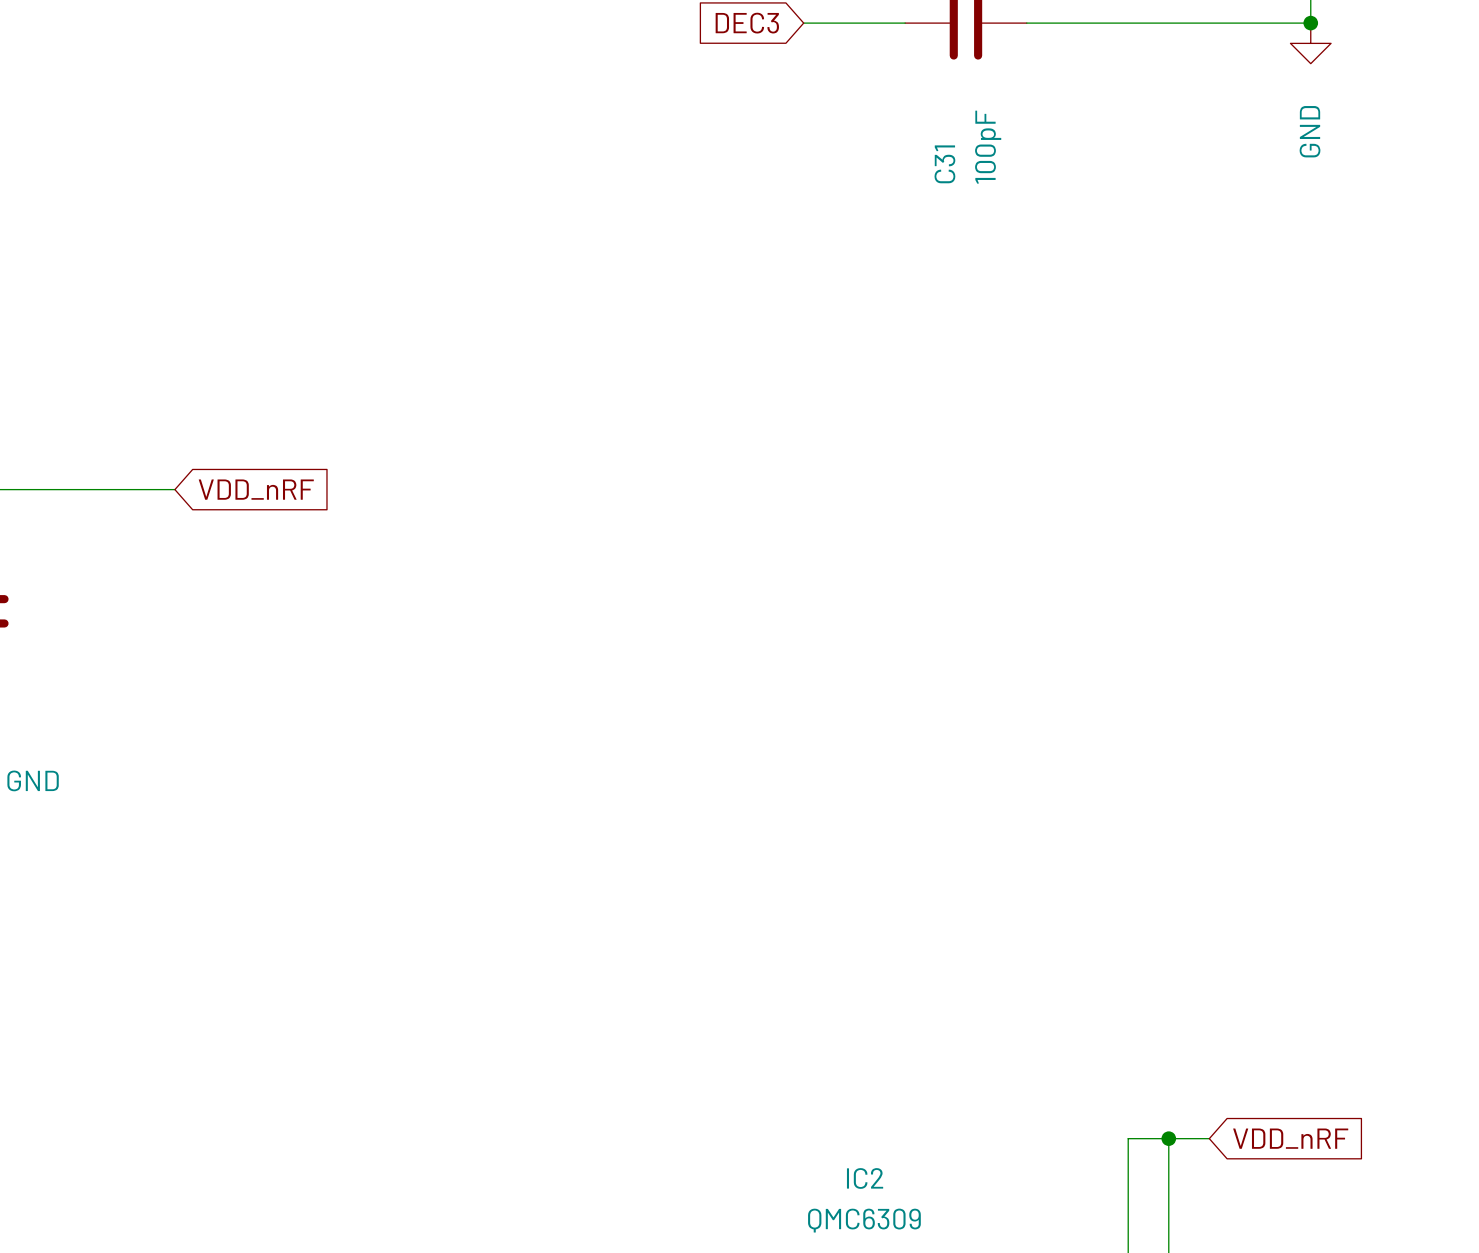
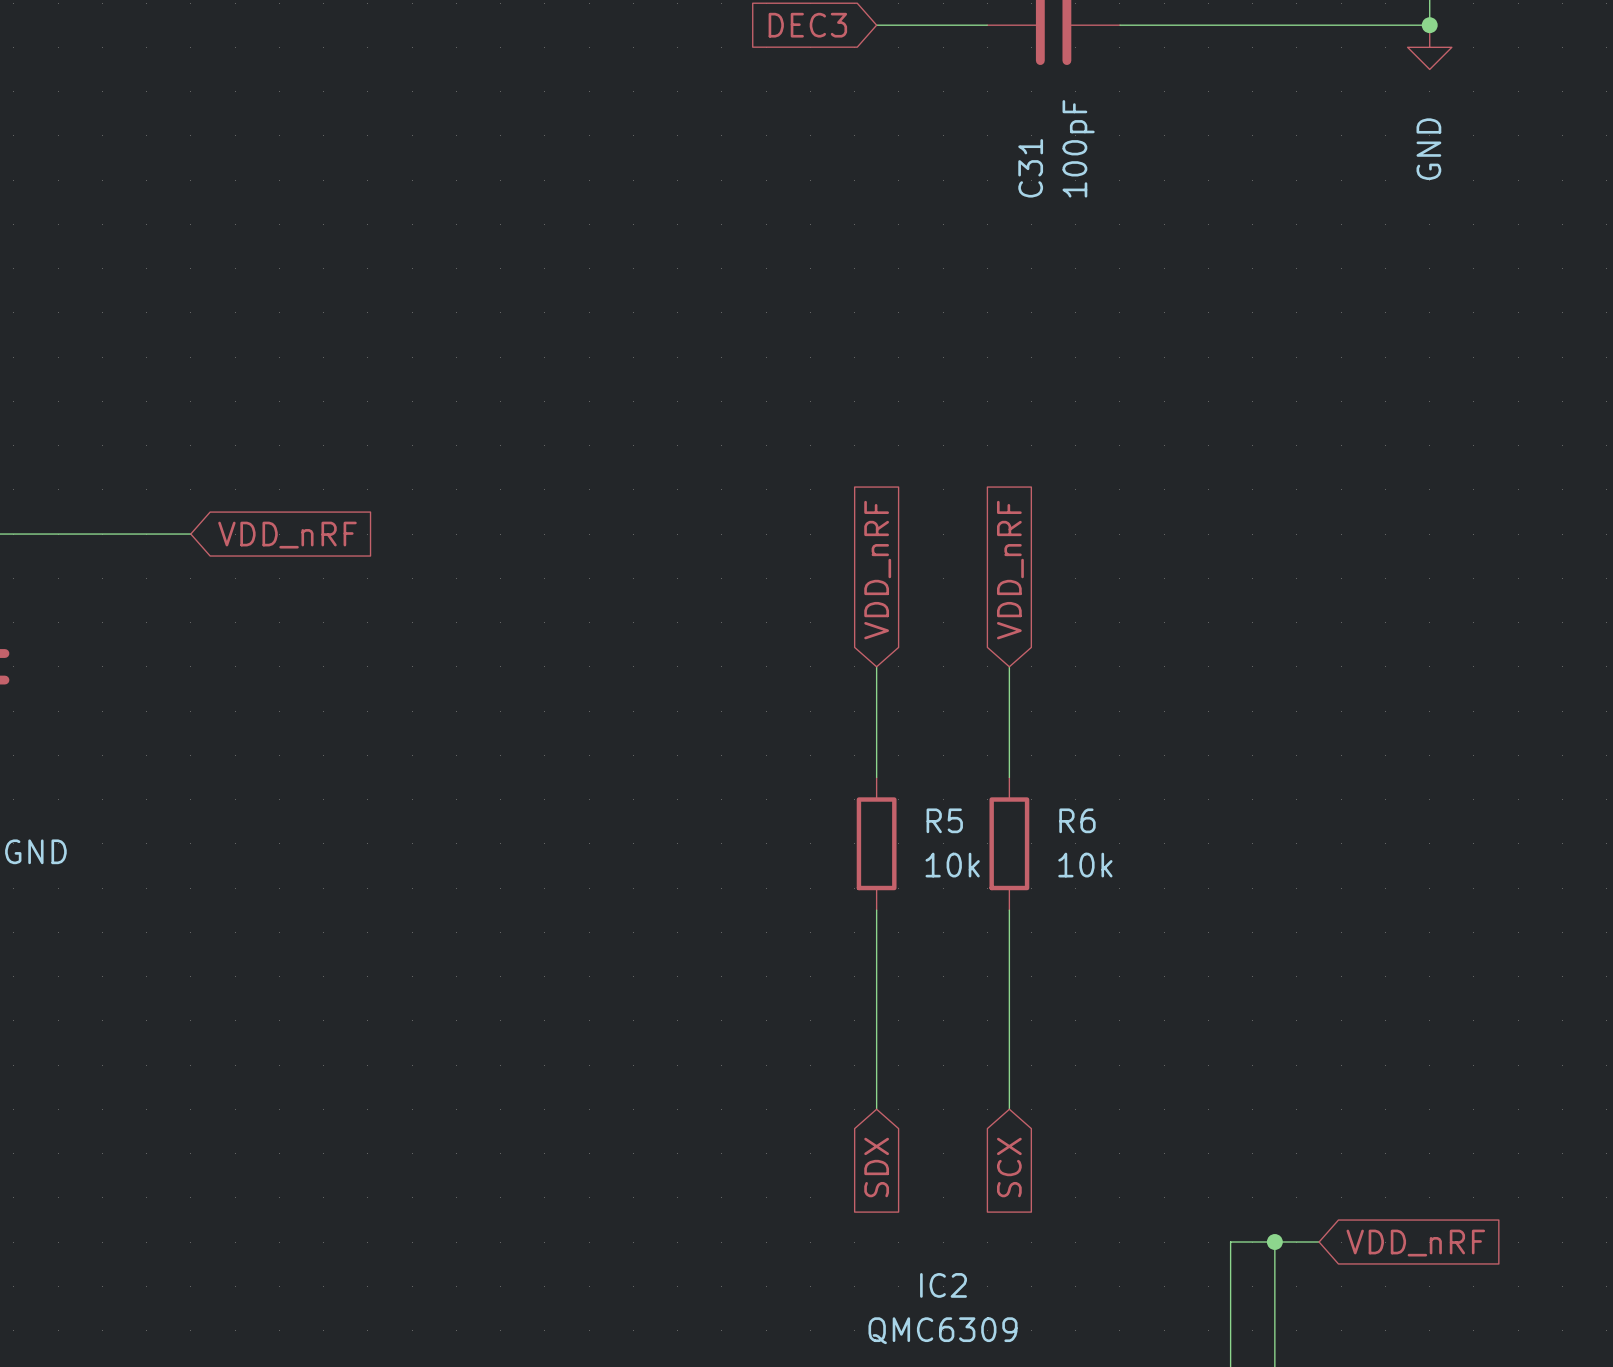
global label: none -> VDD_nRF (877, 570)
global label: none -> VDD_nRF (1010, 570)
wire: none -> (876, 666) (876, 777)
wire: none -> (1009, 666) (1009, 777)
R5: none -> 10k (876, 843)
R6: none -> 10k (1009, 843)
wire: none -> (876, 910) (876, 1109)
wire: none -> (1009, 910) (1009, 1109)
global label: none -> SDX (876, 1167)
global label: none -> SCX (1009, 1167)

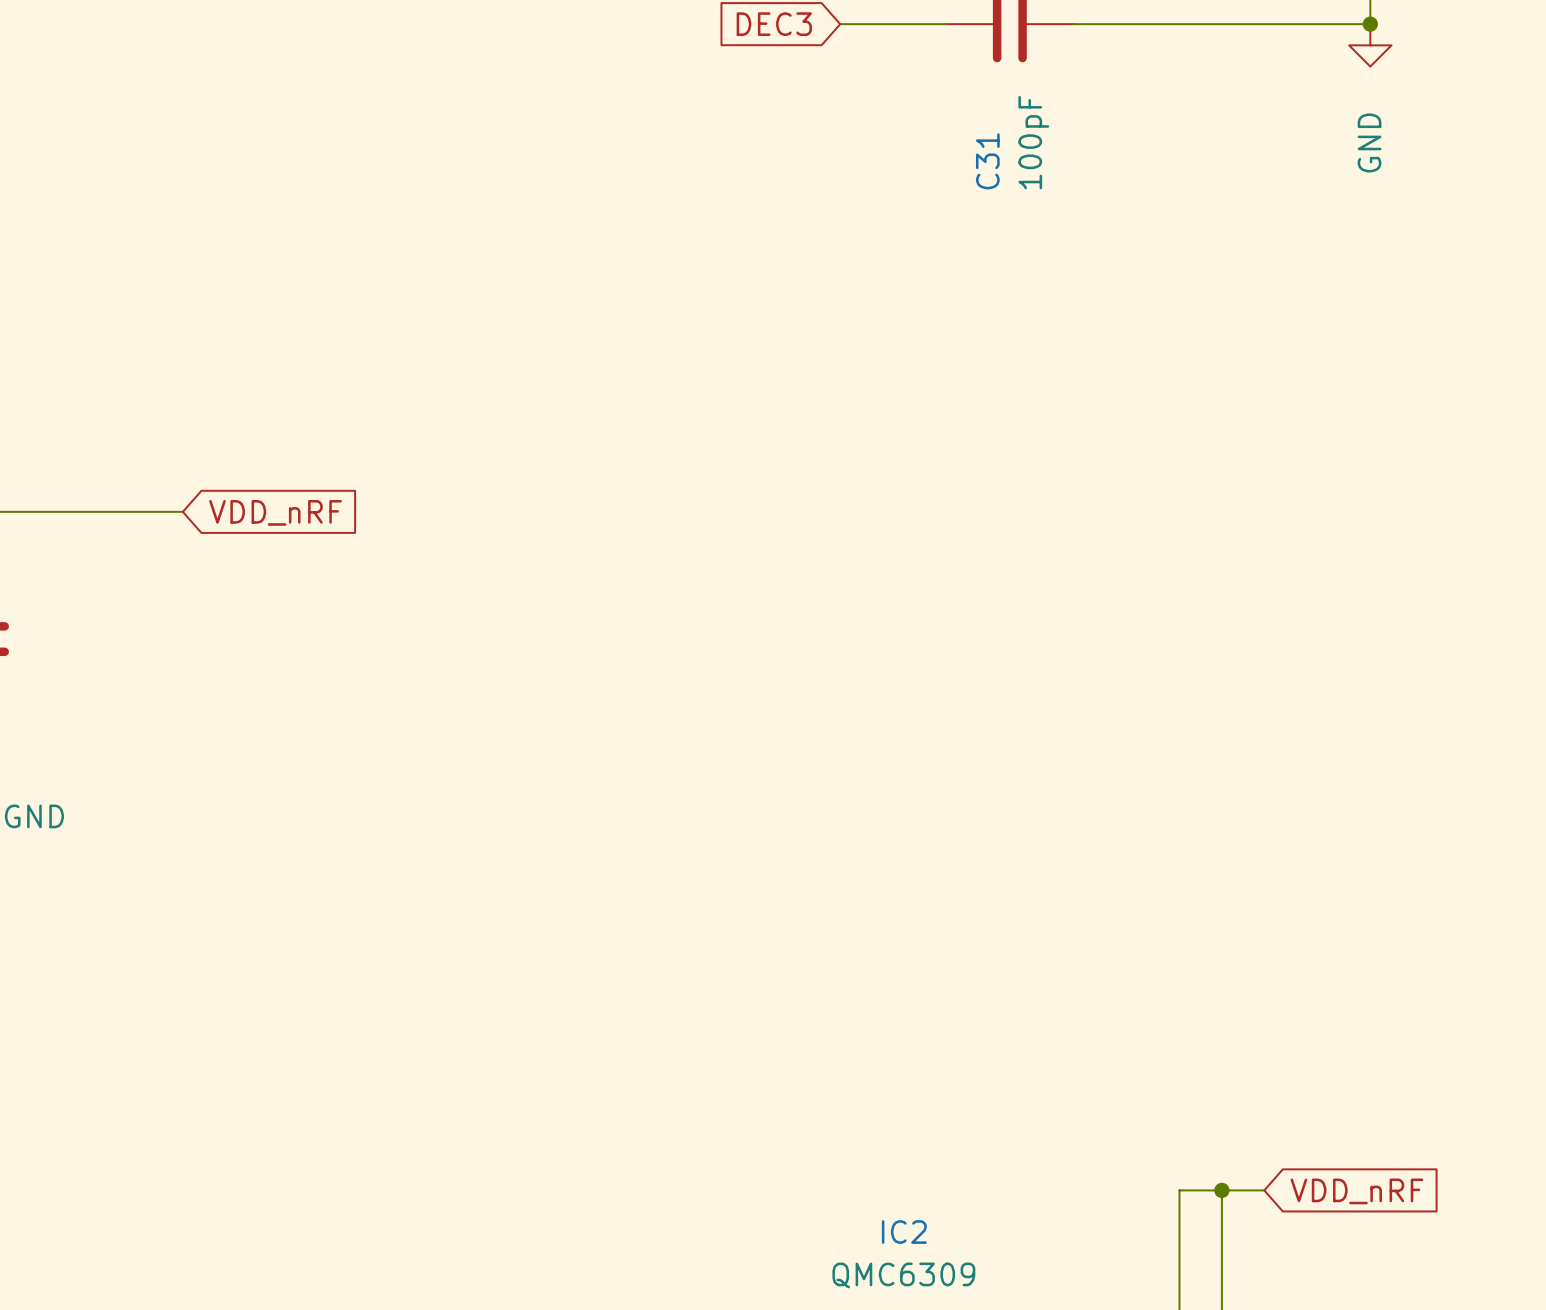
global label: VDD_nRF (877, 570) -> none
global label: VDD_nRF (1010, 570) -> none
wire: (876, 666) (876, 777) -> none
wire: (1009, 666) (1009, 777) -> none
R5: 10k (876, 843) -> none
R6: 10k (1009, 843) -> none
wire: (876, 910) (876, 1109) -> none
wire: (1009, 910) (1009, 1109) -> none
global label: SDX (876, 1167) -> none
global label: SCX (1009, 1167) -> none

